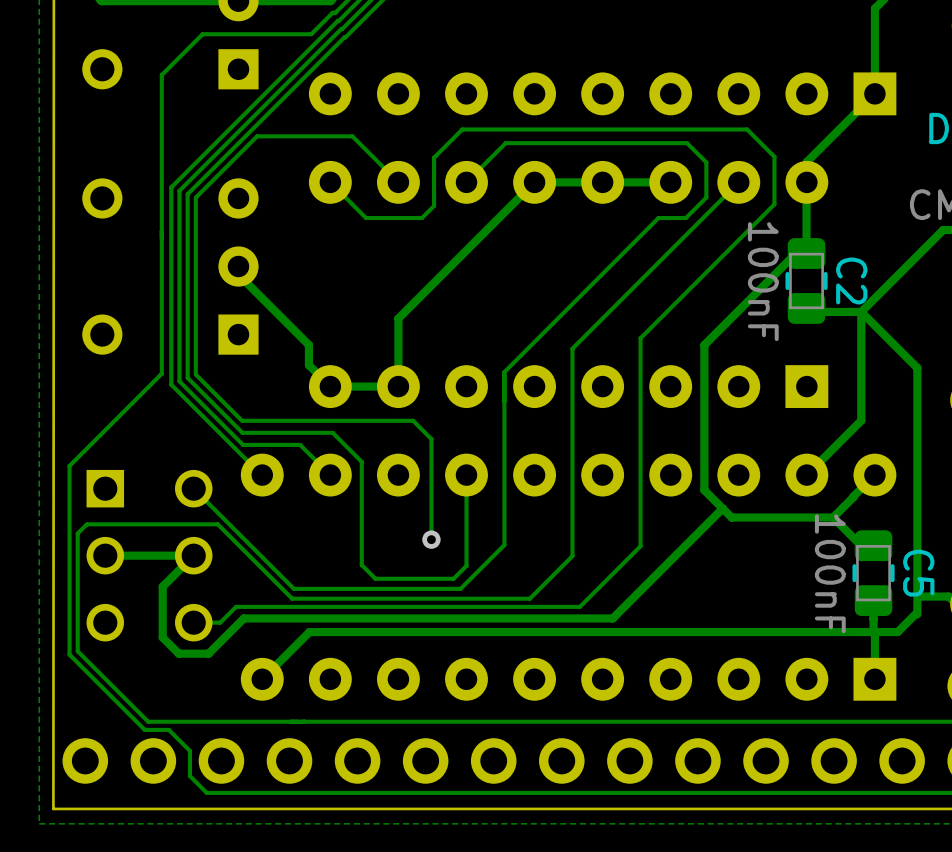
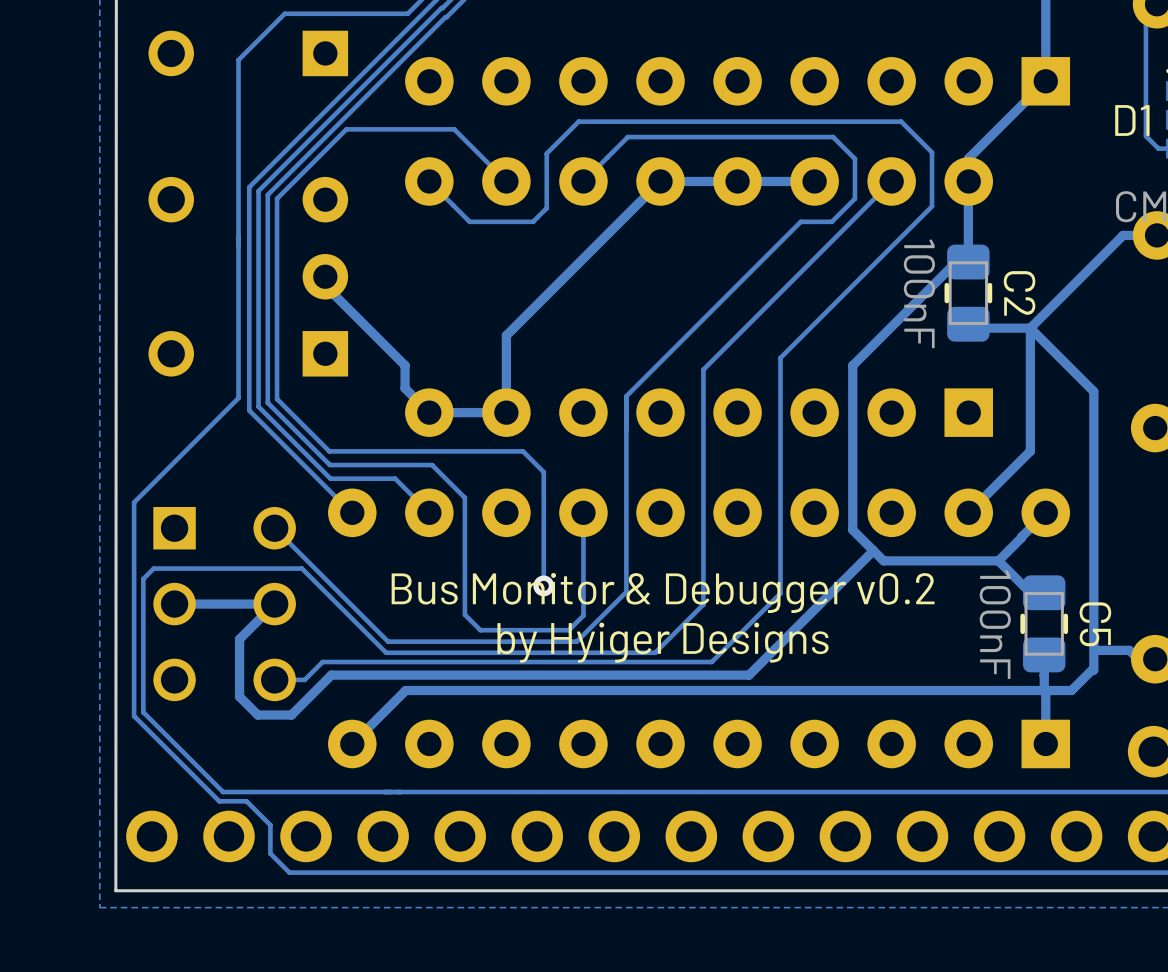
text: none -> Bus Monitor & Debugger v0.2 (663, 593)
text: none -> by Hyiger Designs (663, 642)

